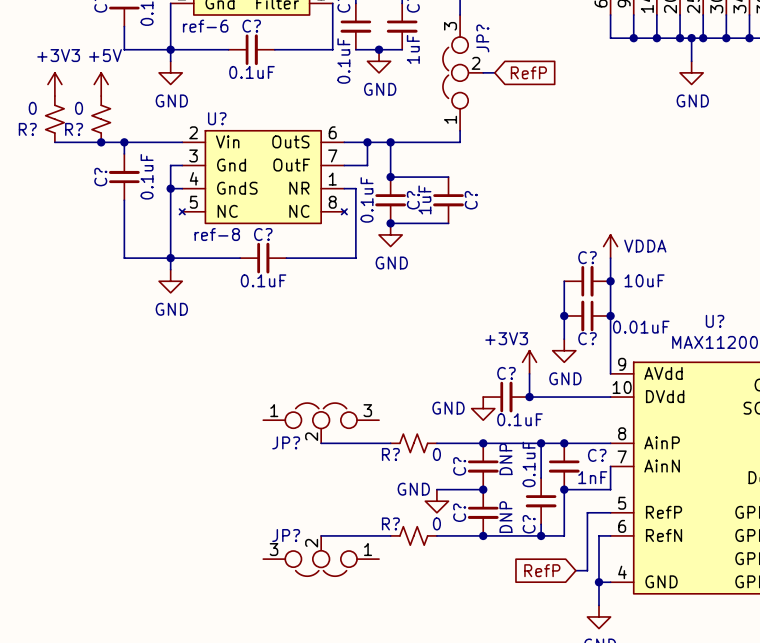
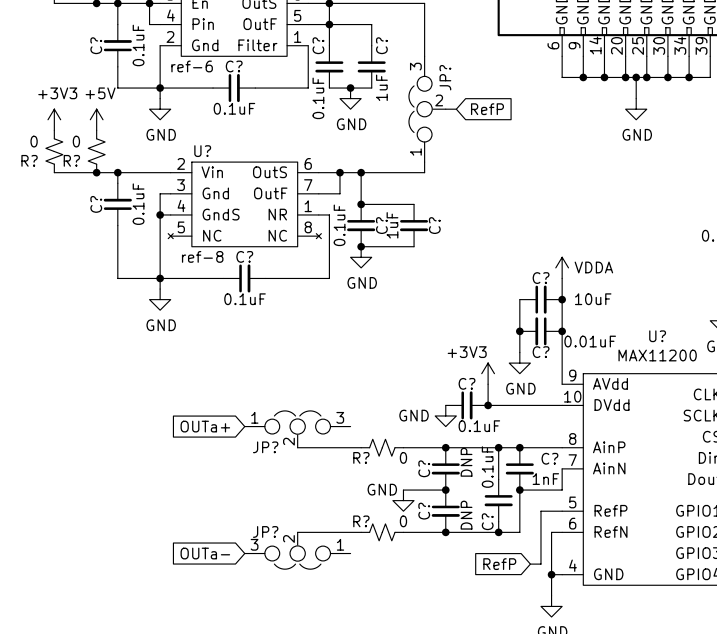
global label: none -> OUTa+ (205, 426)
global label: none -> OUTa- (205, 553)

